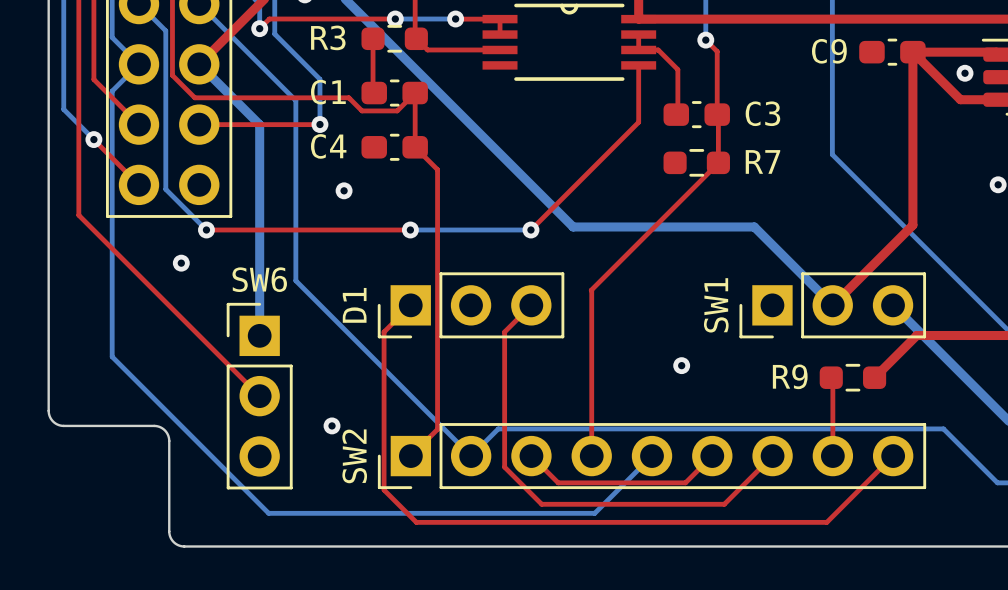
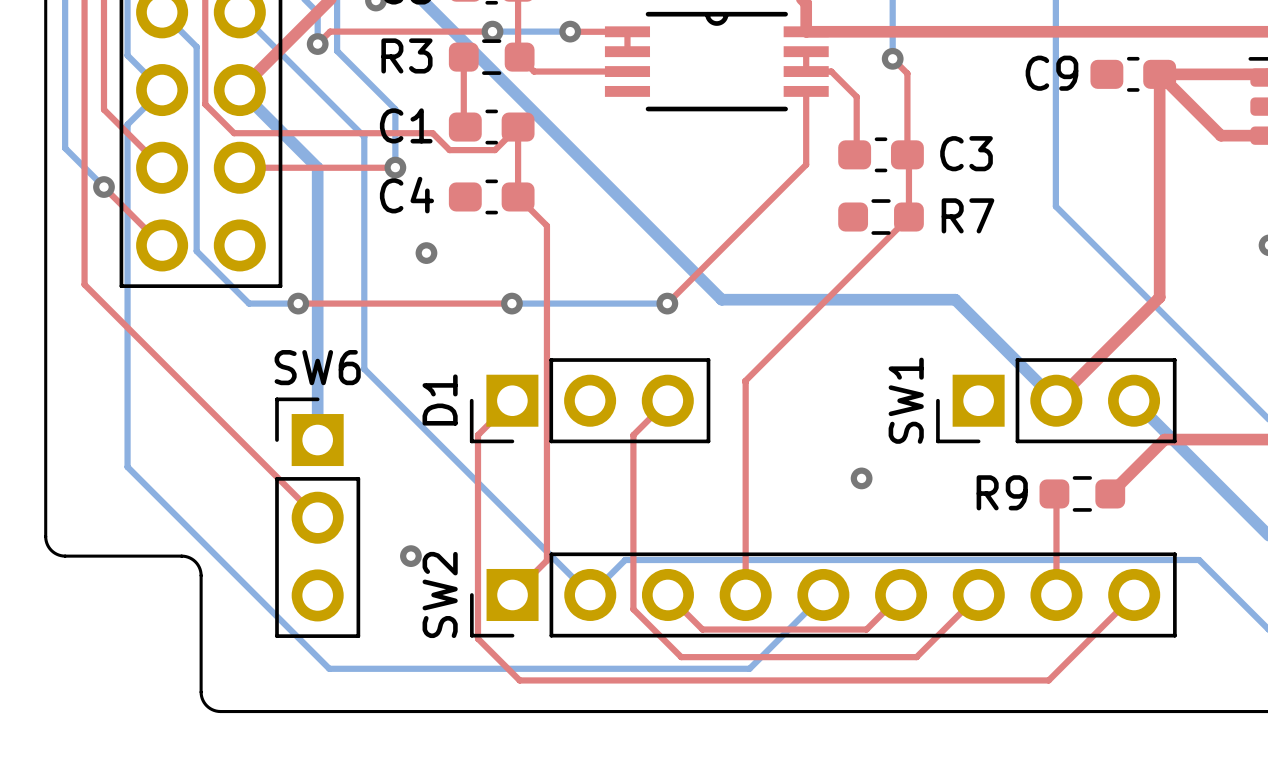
via: (965, 73) -> none
top track: (206, 230) (244, 230) -> none
bottom track: none -> (249, 303) (298, 303)
via: (206, 230) -> none
via: none -> (298, 303)
via: (181, 263) -> none

